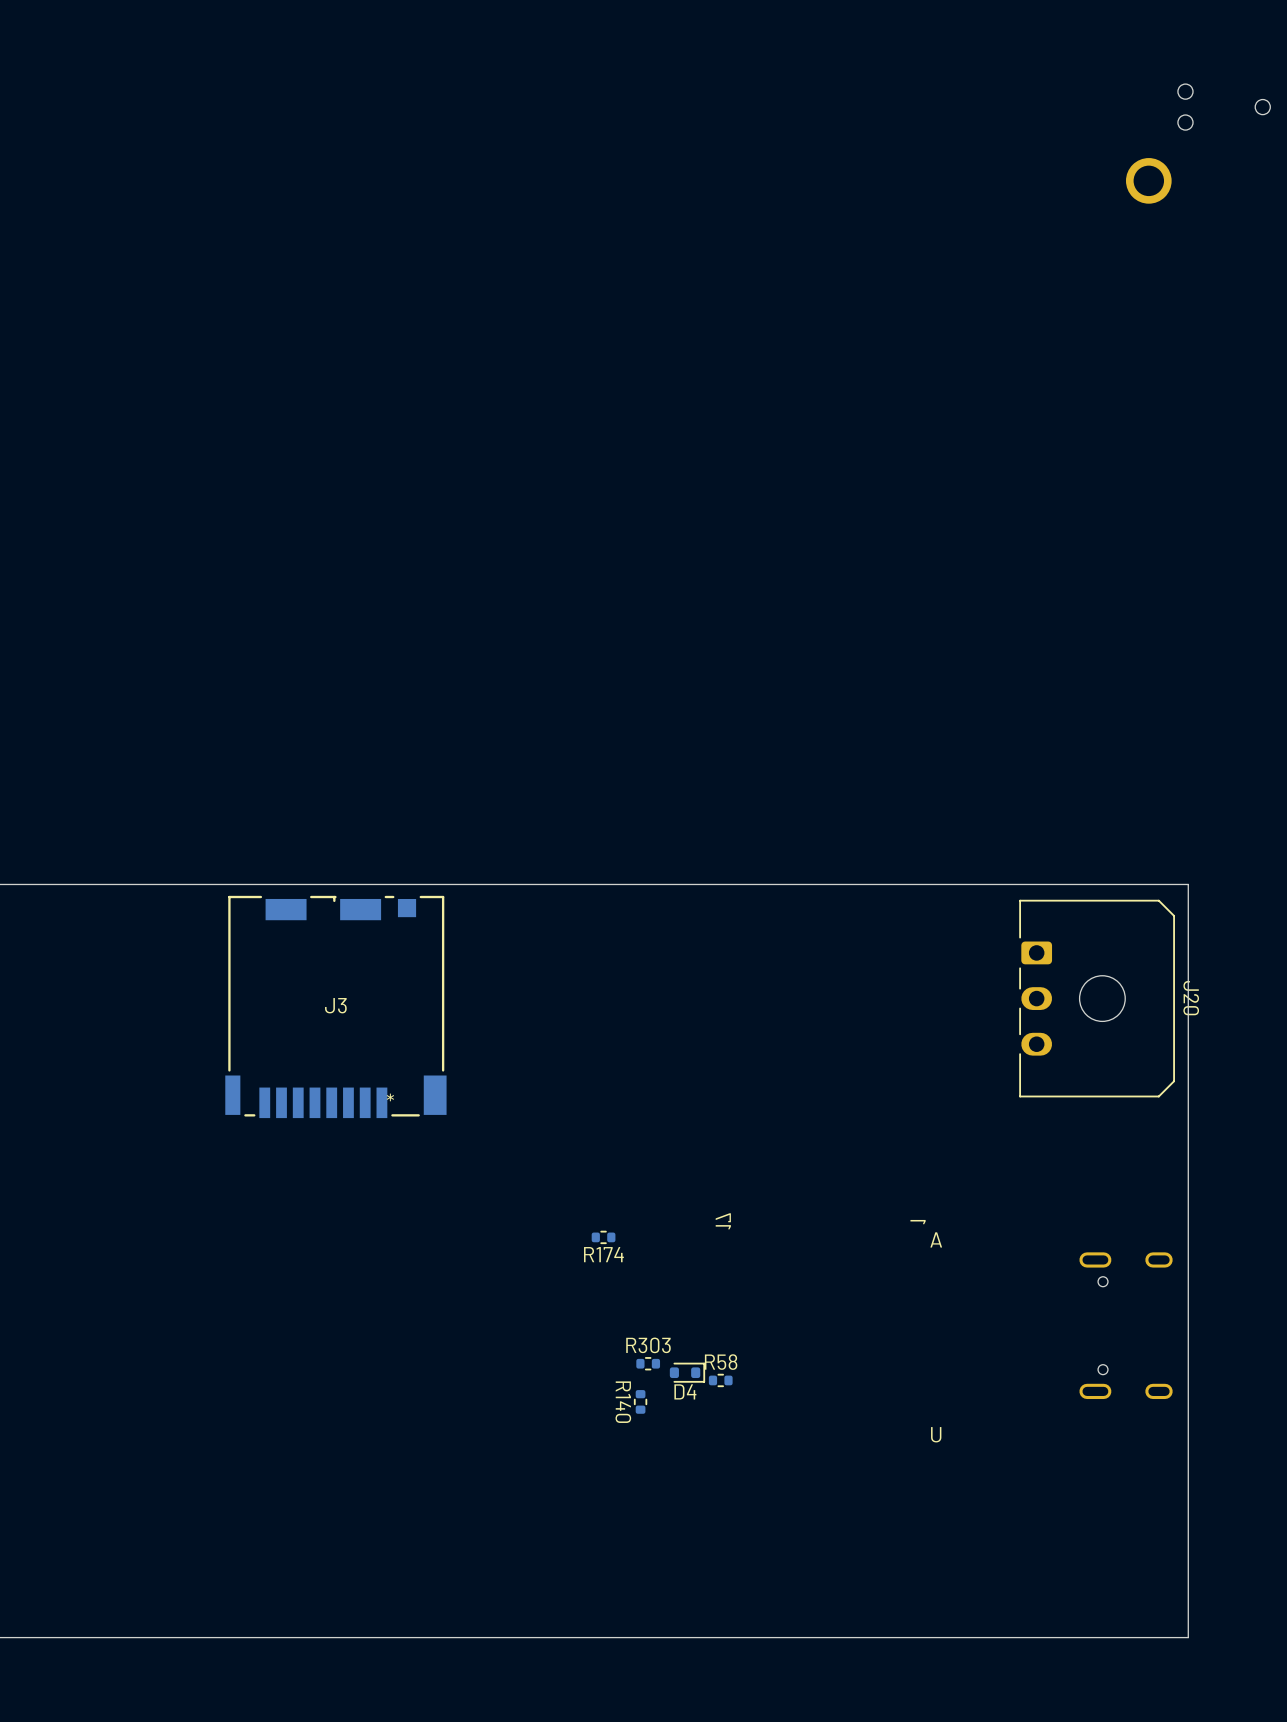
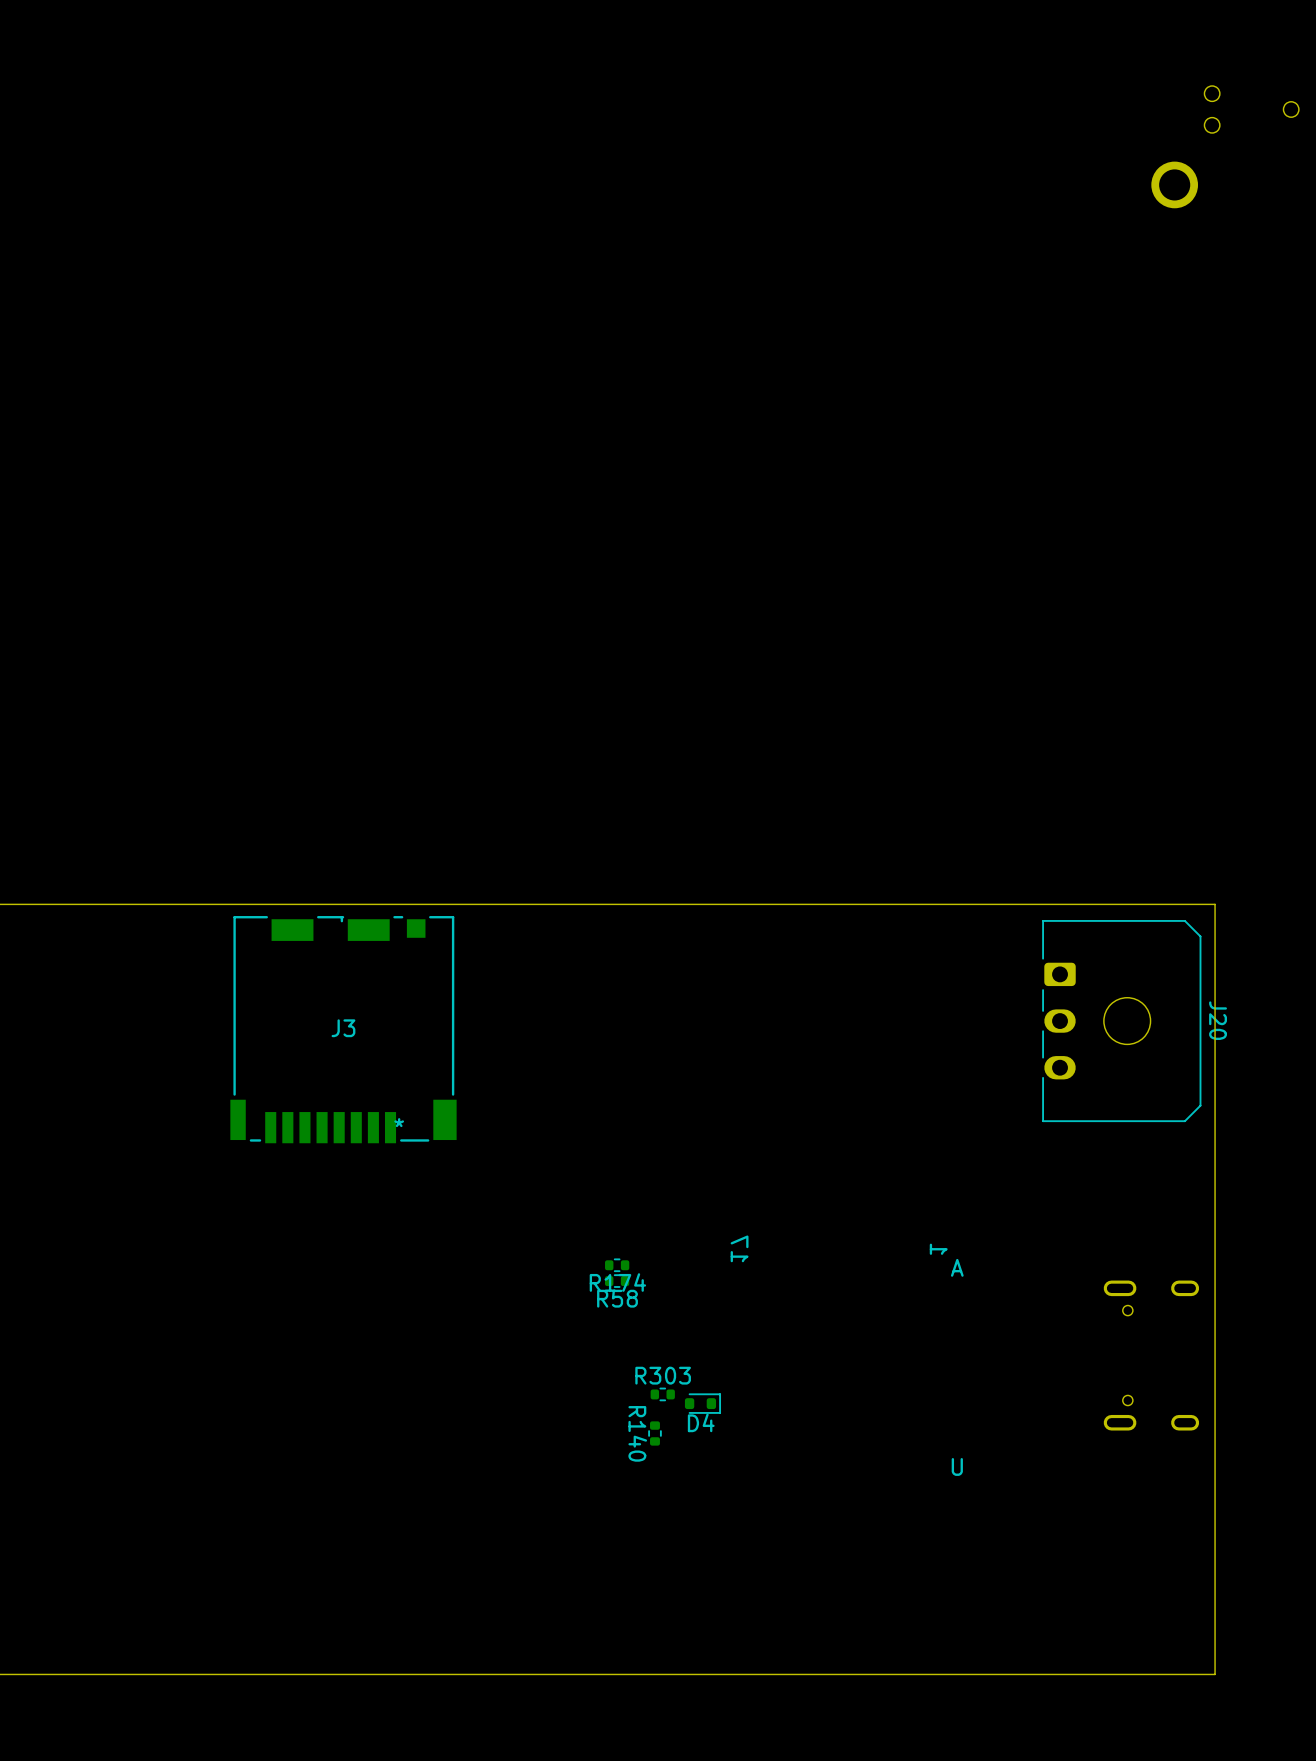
R58 name position: R58 (721, 1362) -> R58 (617, 1298)
R58 position: (720, 1380) -> (617, 1281)

